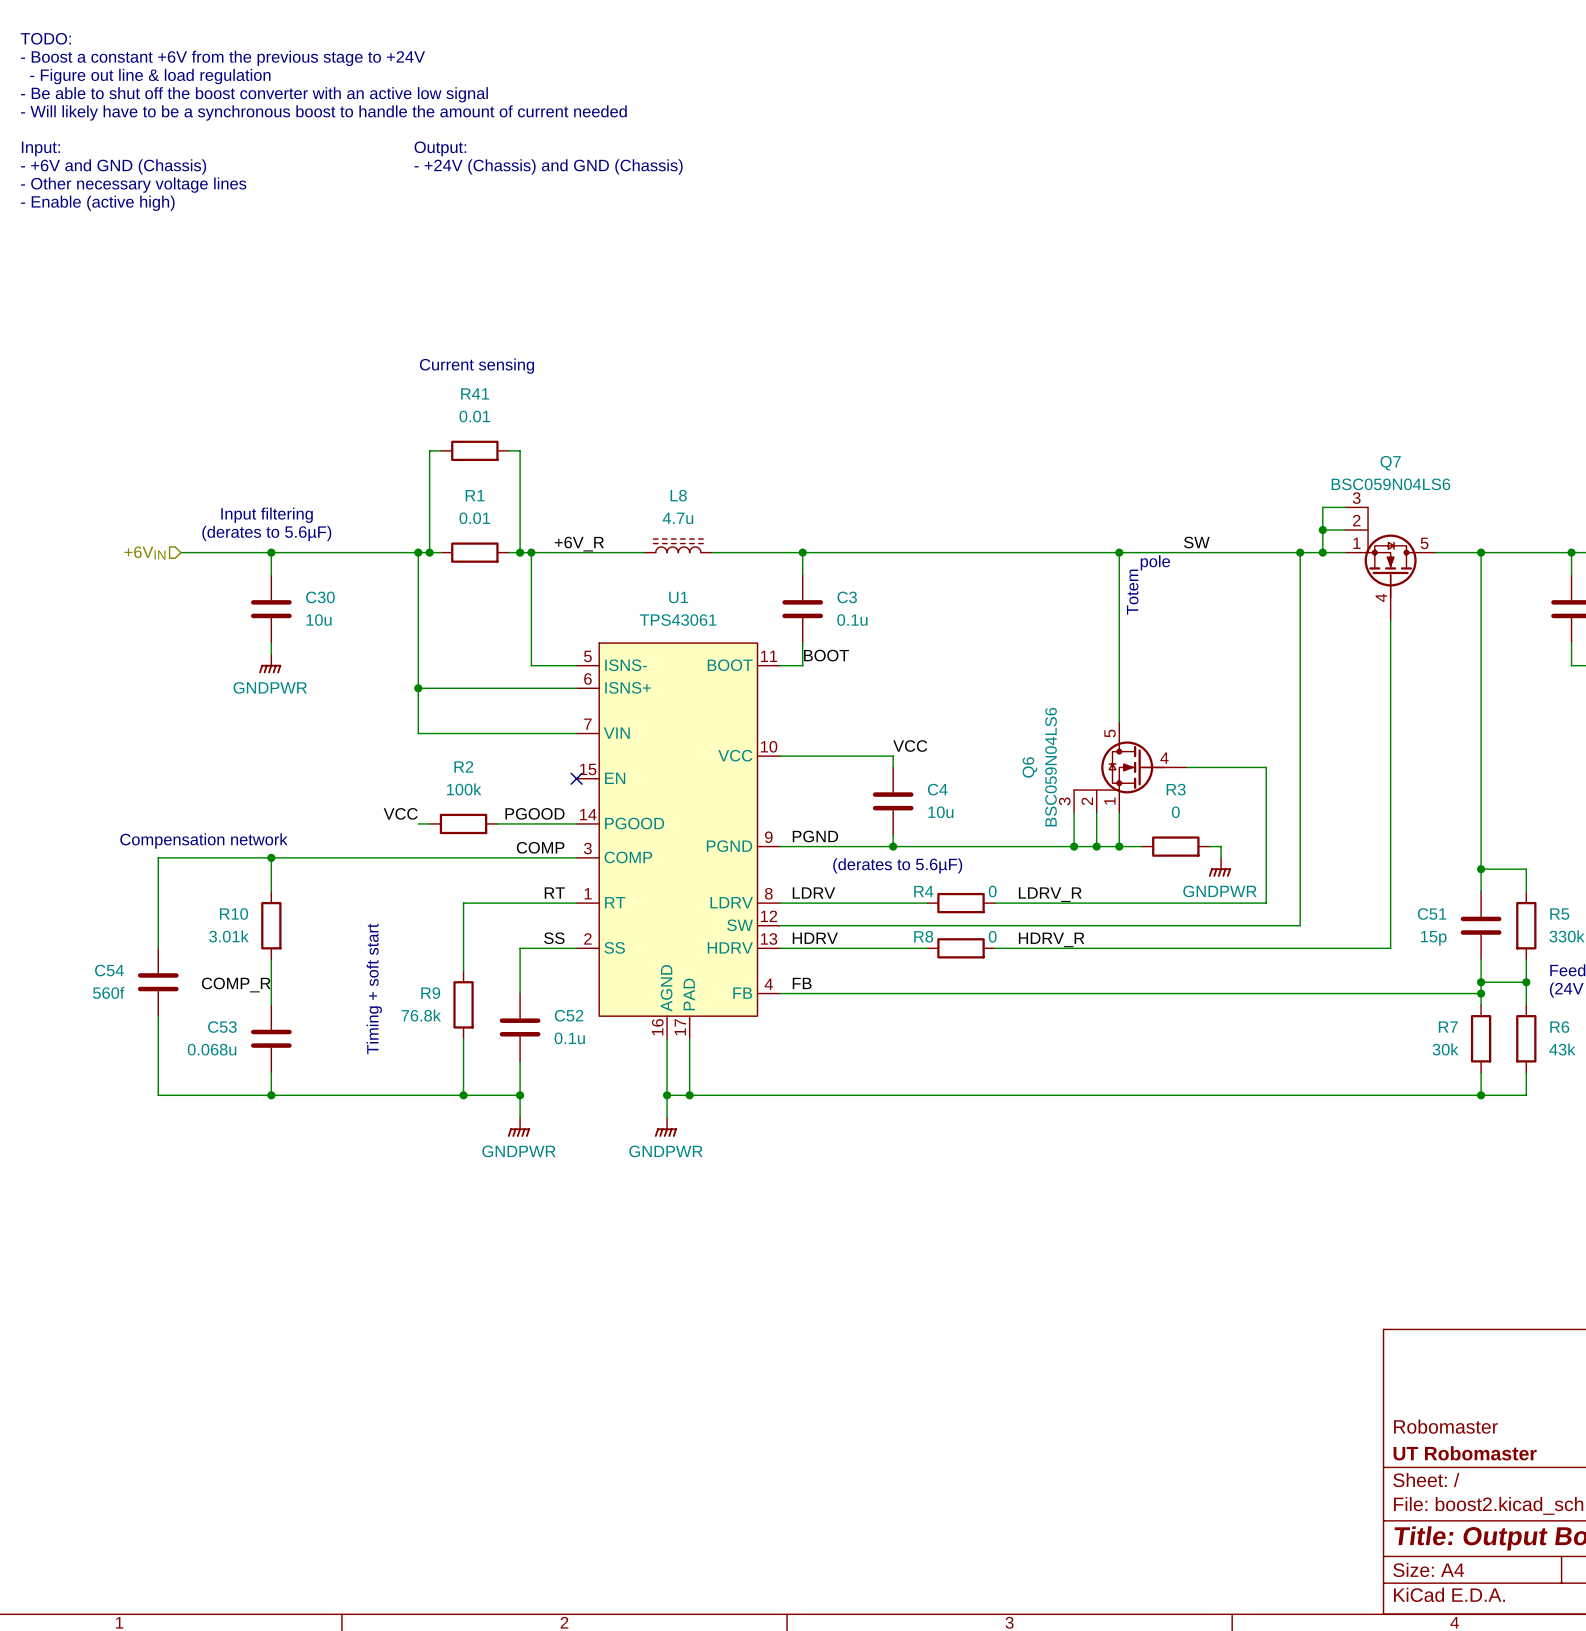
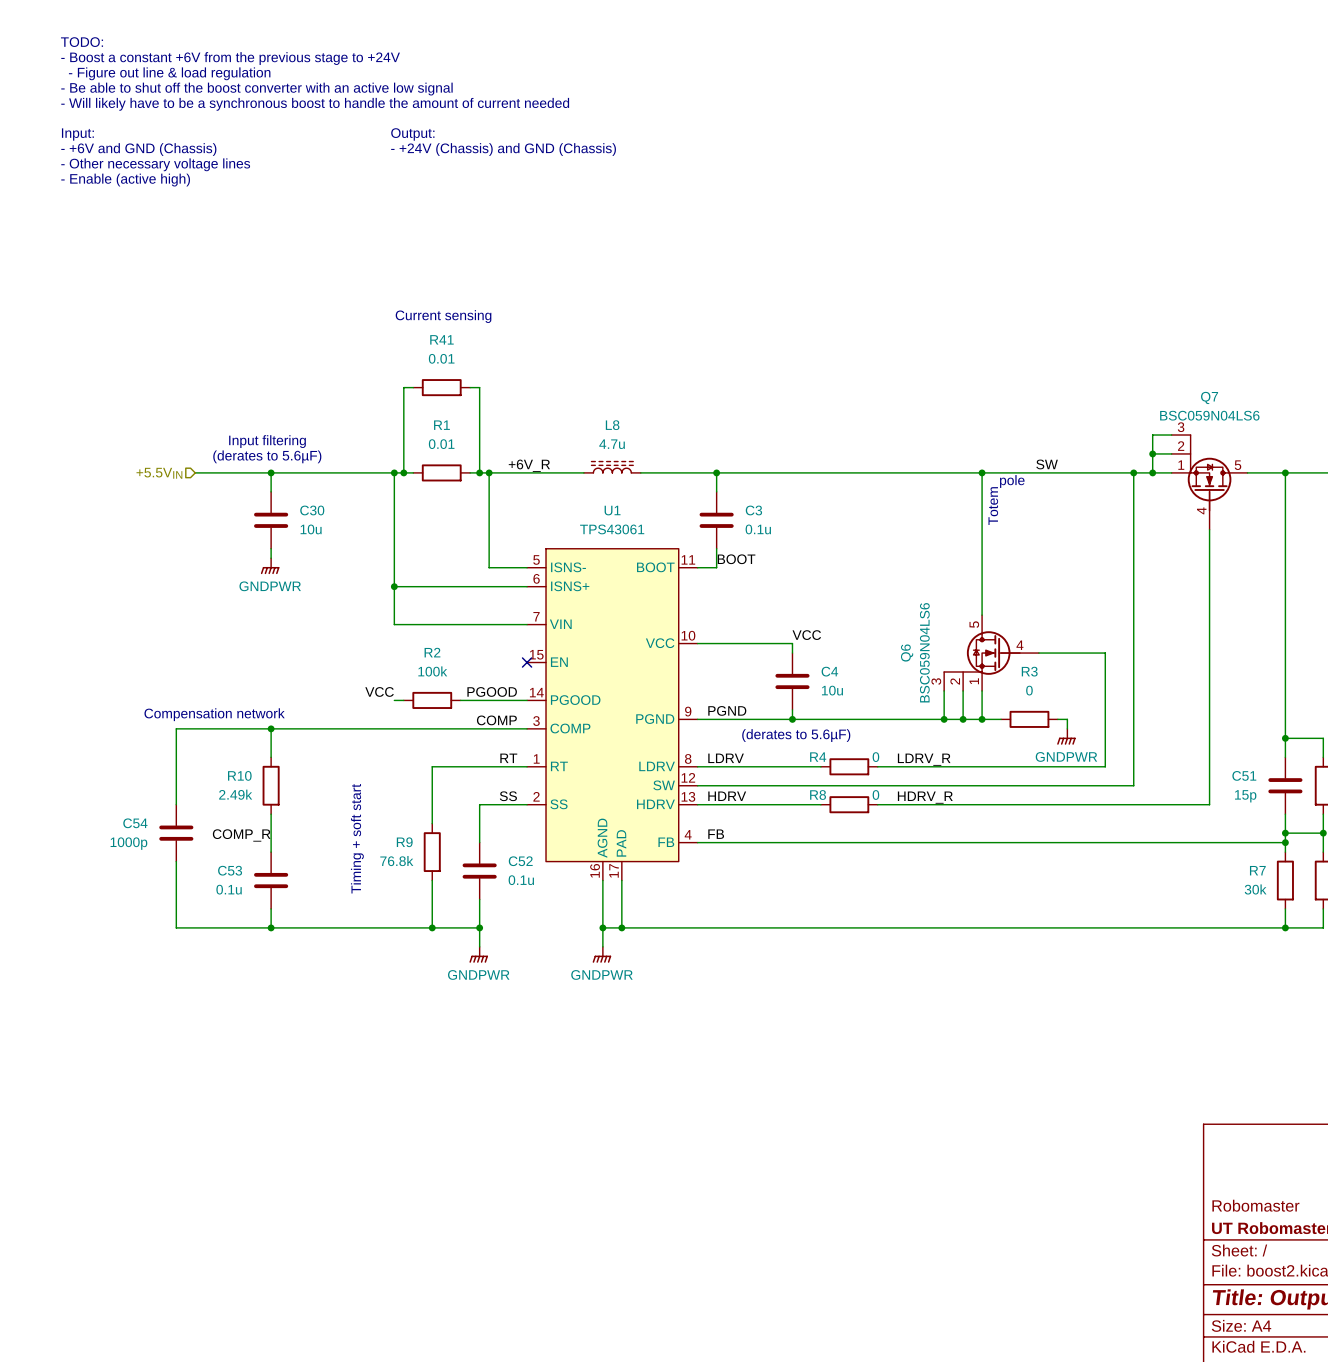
hierarchical label: +6VIN (144, 552) -> +5.5VIN (159, 473)
R10 value: 3.01k (228, 936) -> 2.49k (235, 794)
C54 value: 560f (108, 992) -> 1000p (128, 843)
C53 value: 0.068u (212, 1049) -> 0.1u (229, 889)

